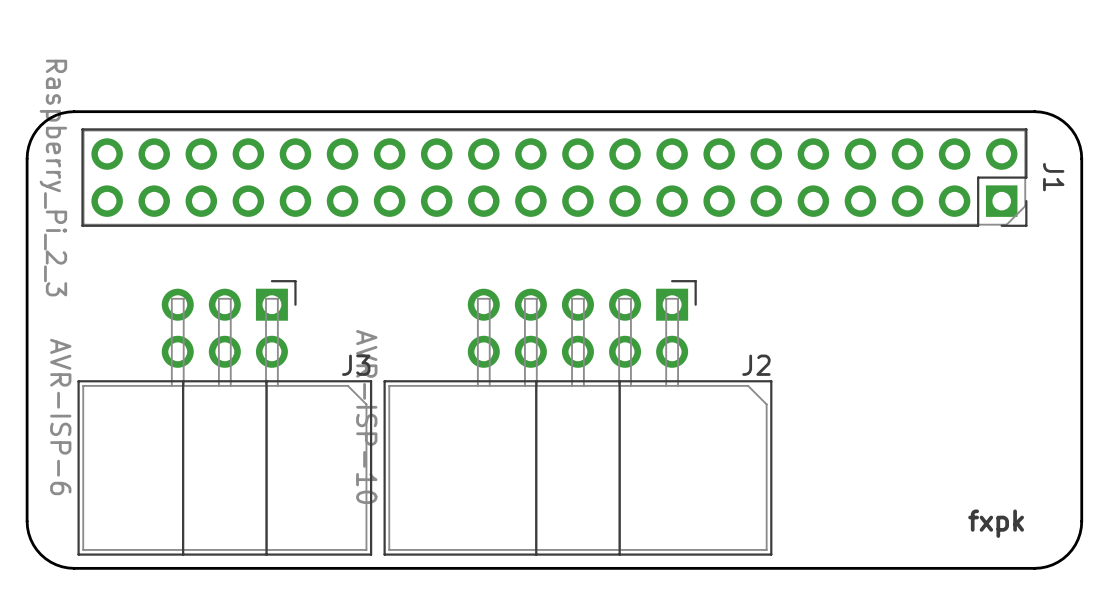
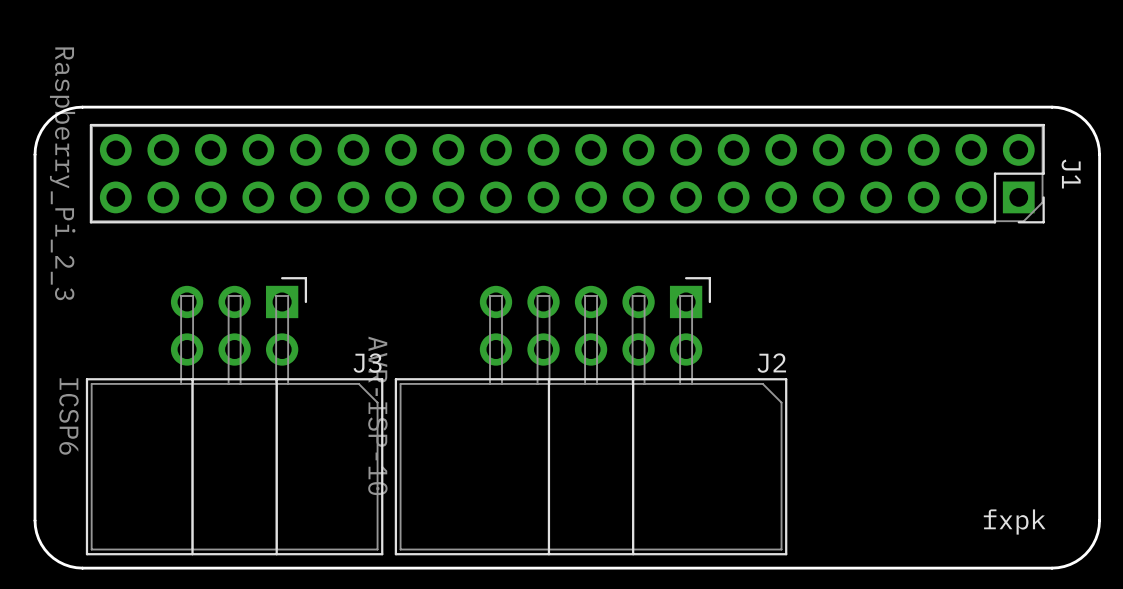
J3 value: AVR-ISP-6 (60, 416) -> ICSP6 (68, 416)

